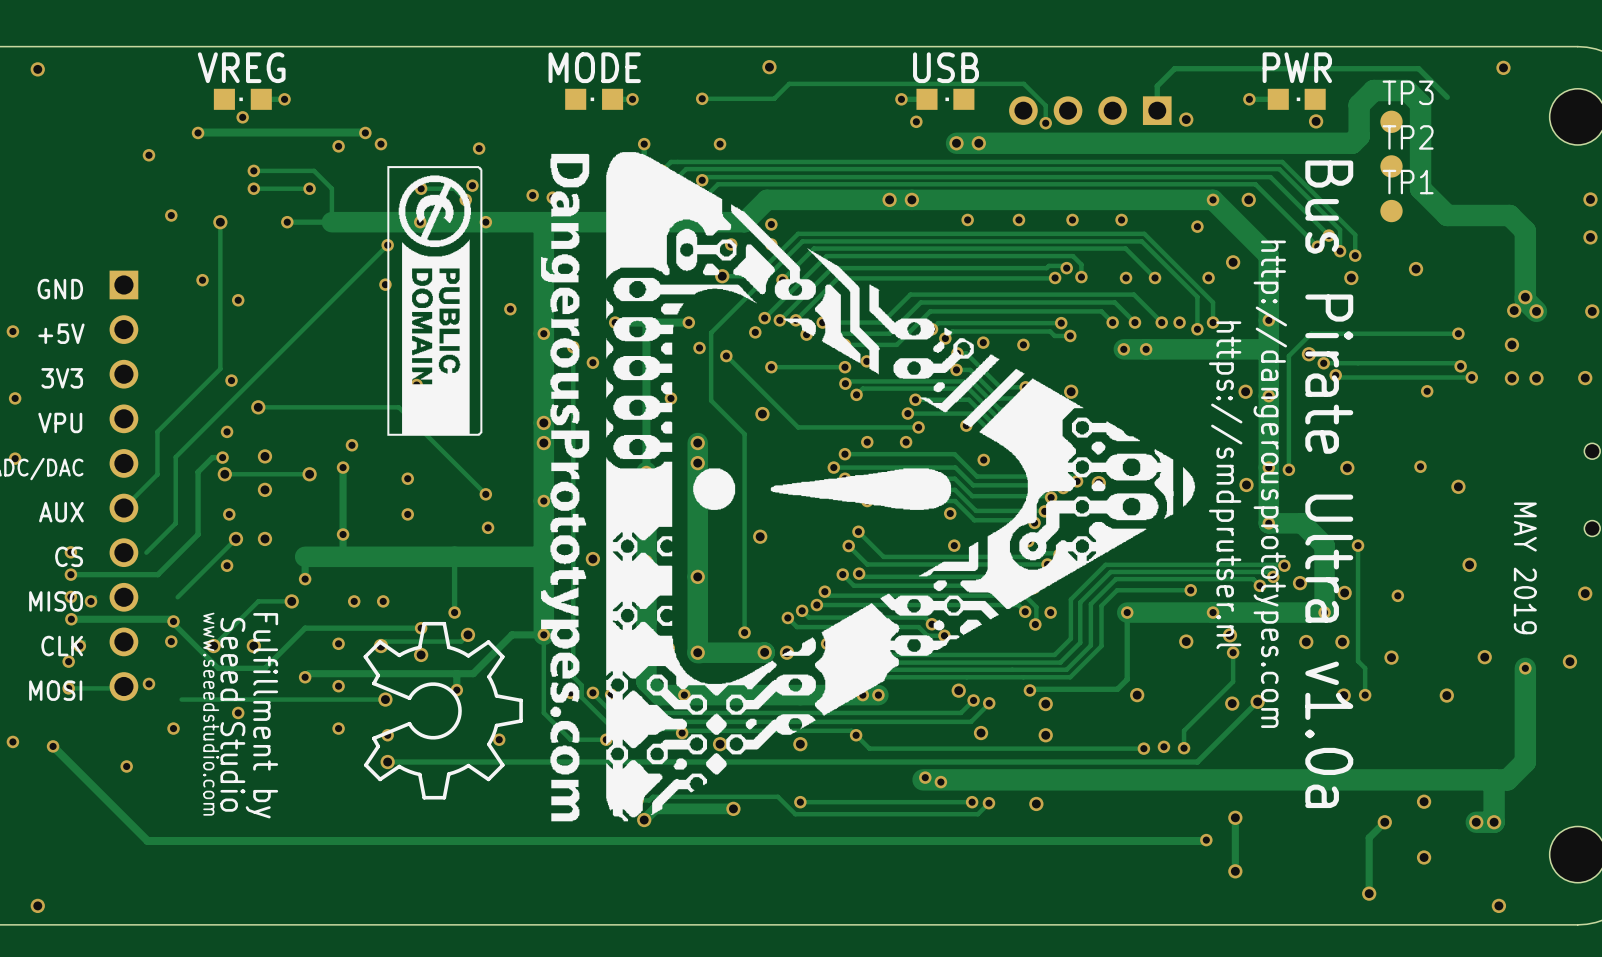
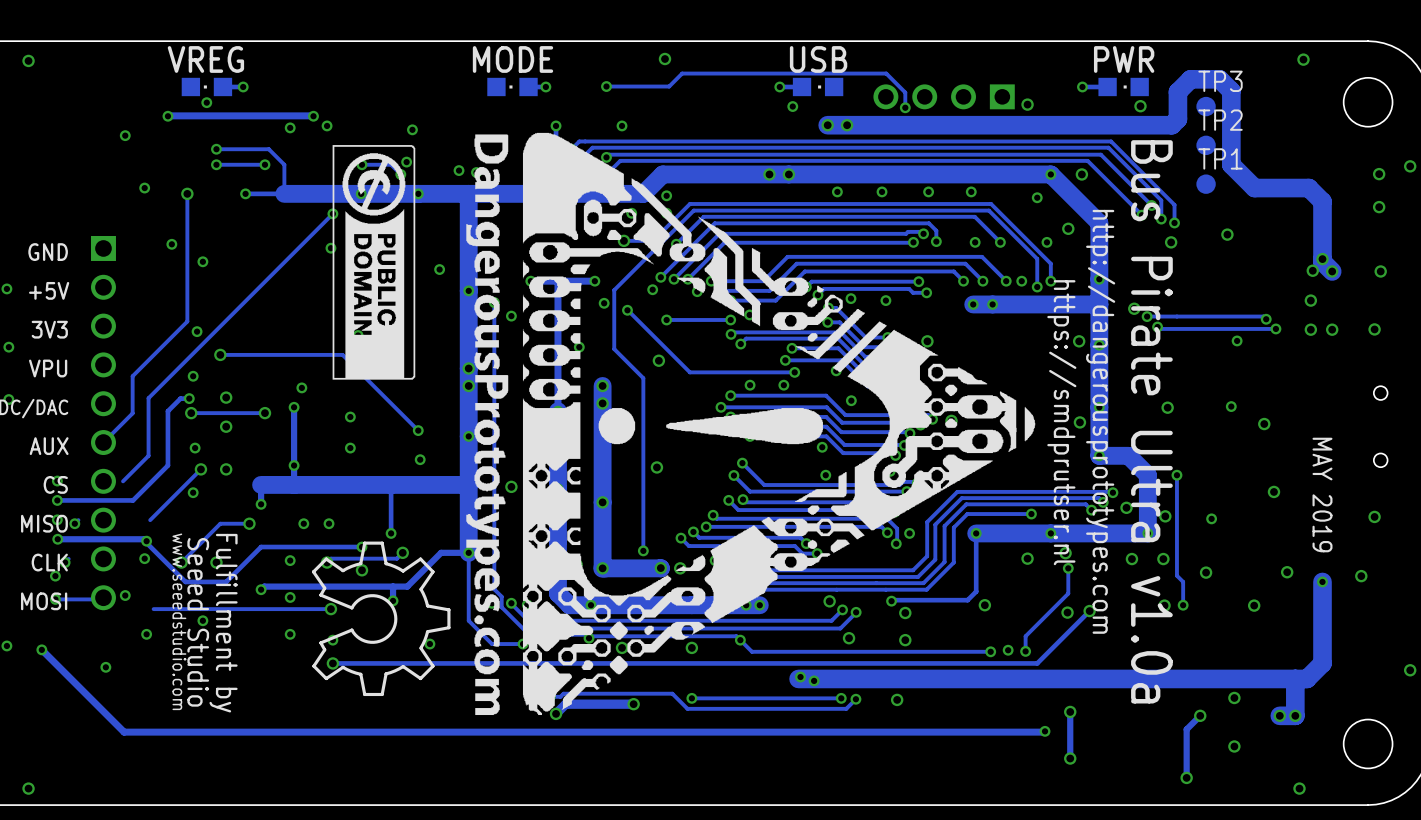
track: (1447, 97) (1418, 68) (1174, 68) (1157, 86) (1157, 110) -> none
track: (1458, 333) (1311, 333) (1288, 356) (1288, 469) -> none
via: (1458, 333) -> none
via: (1288, 469) -> none

